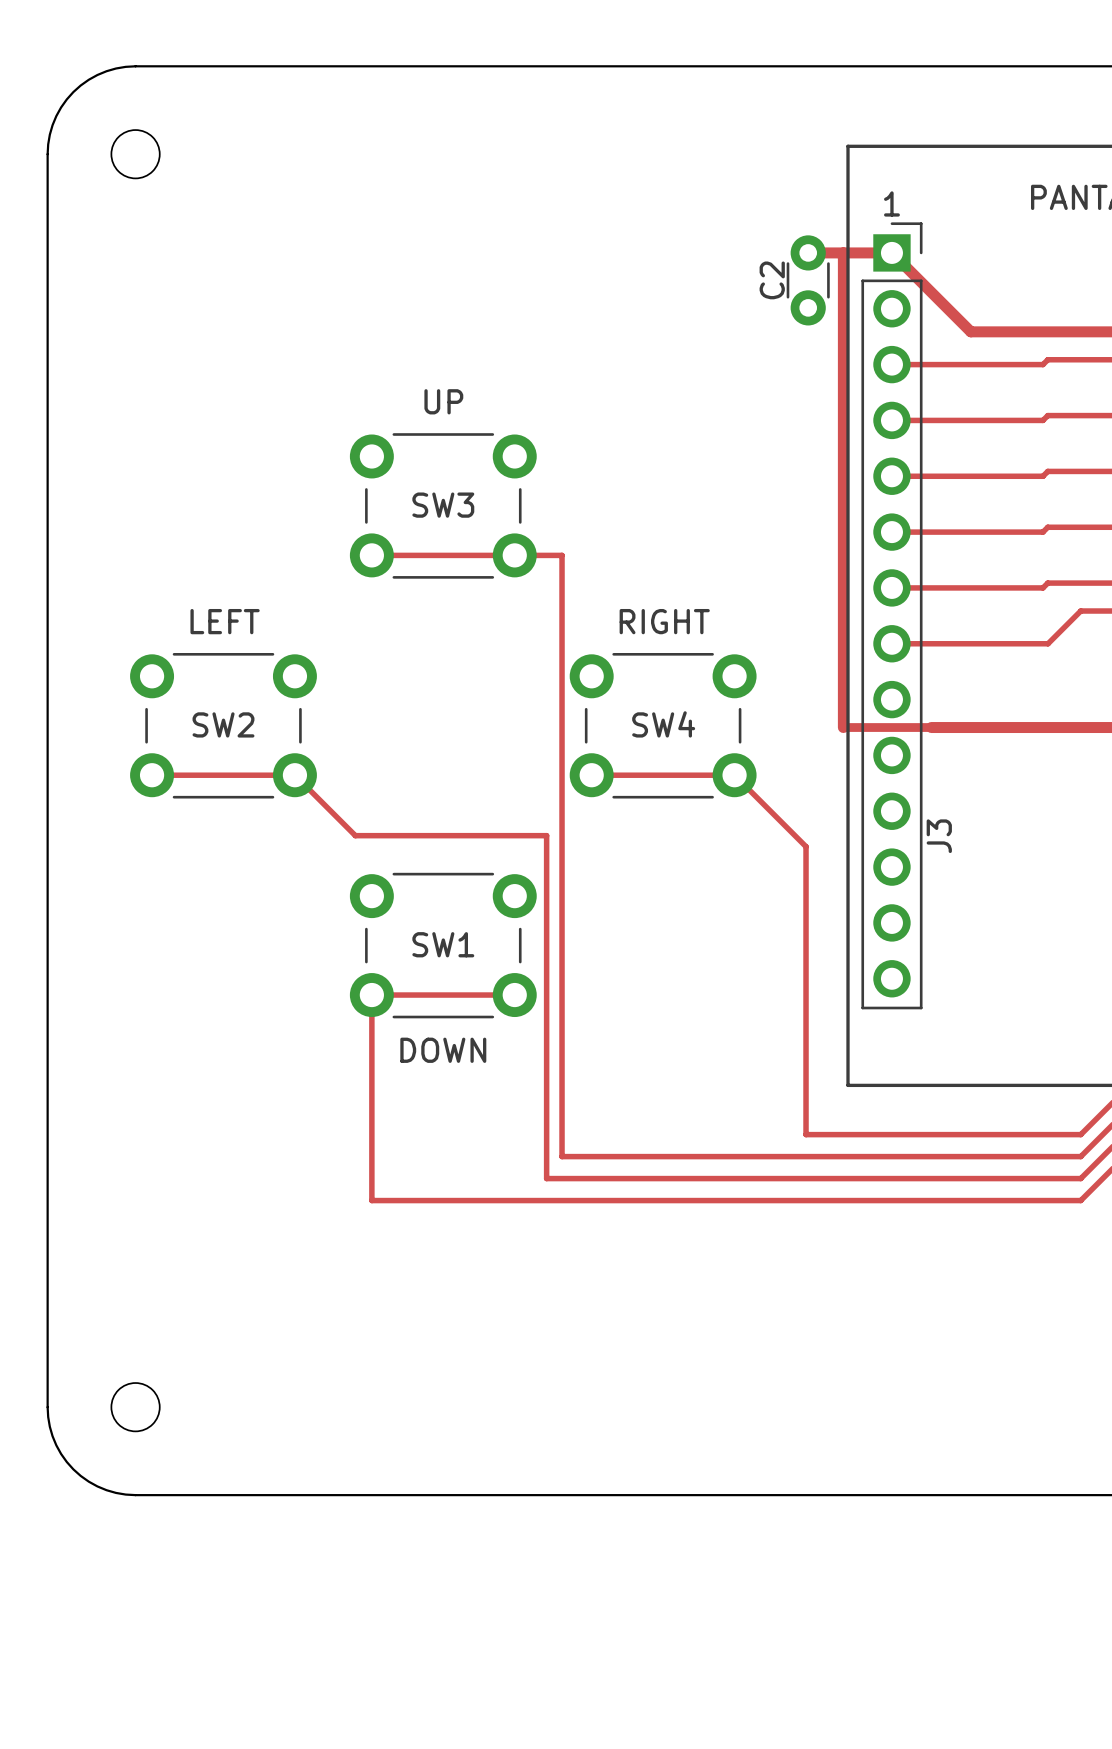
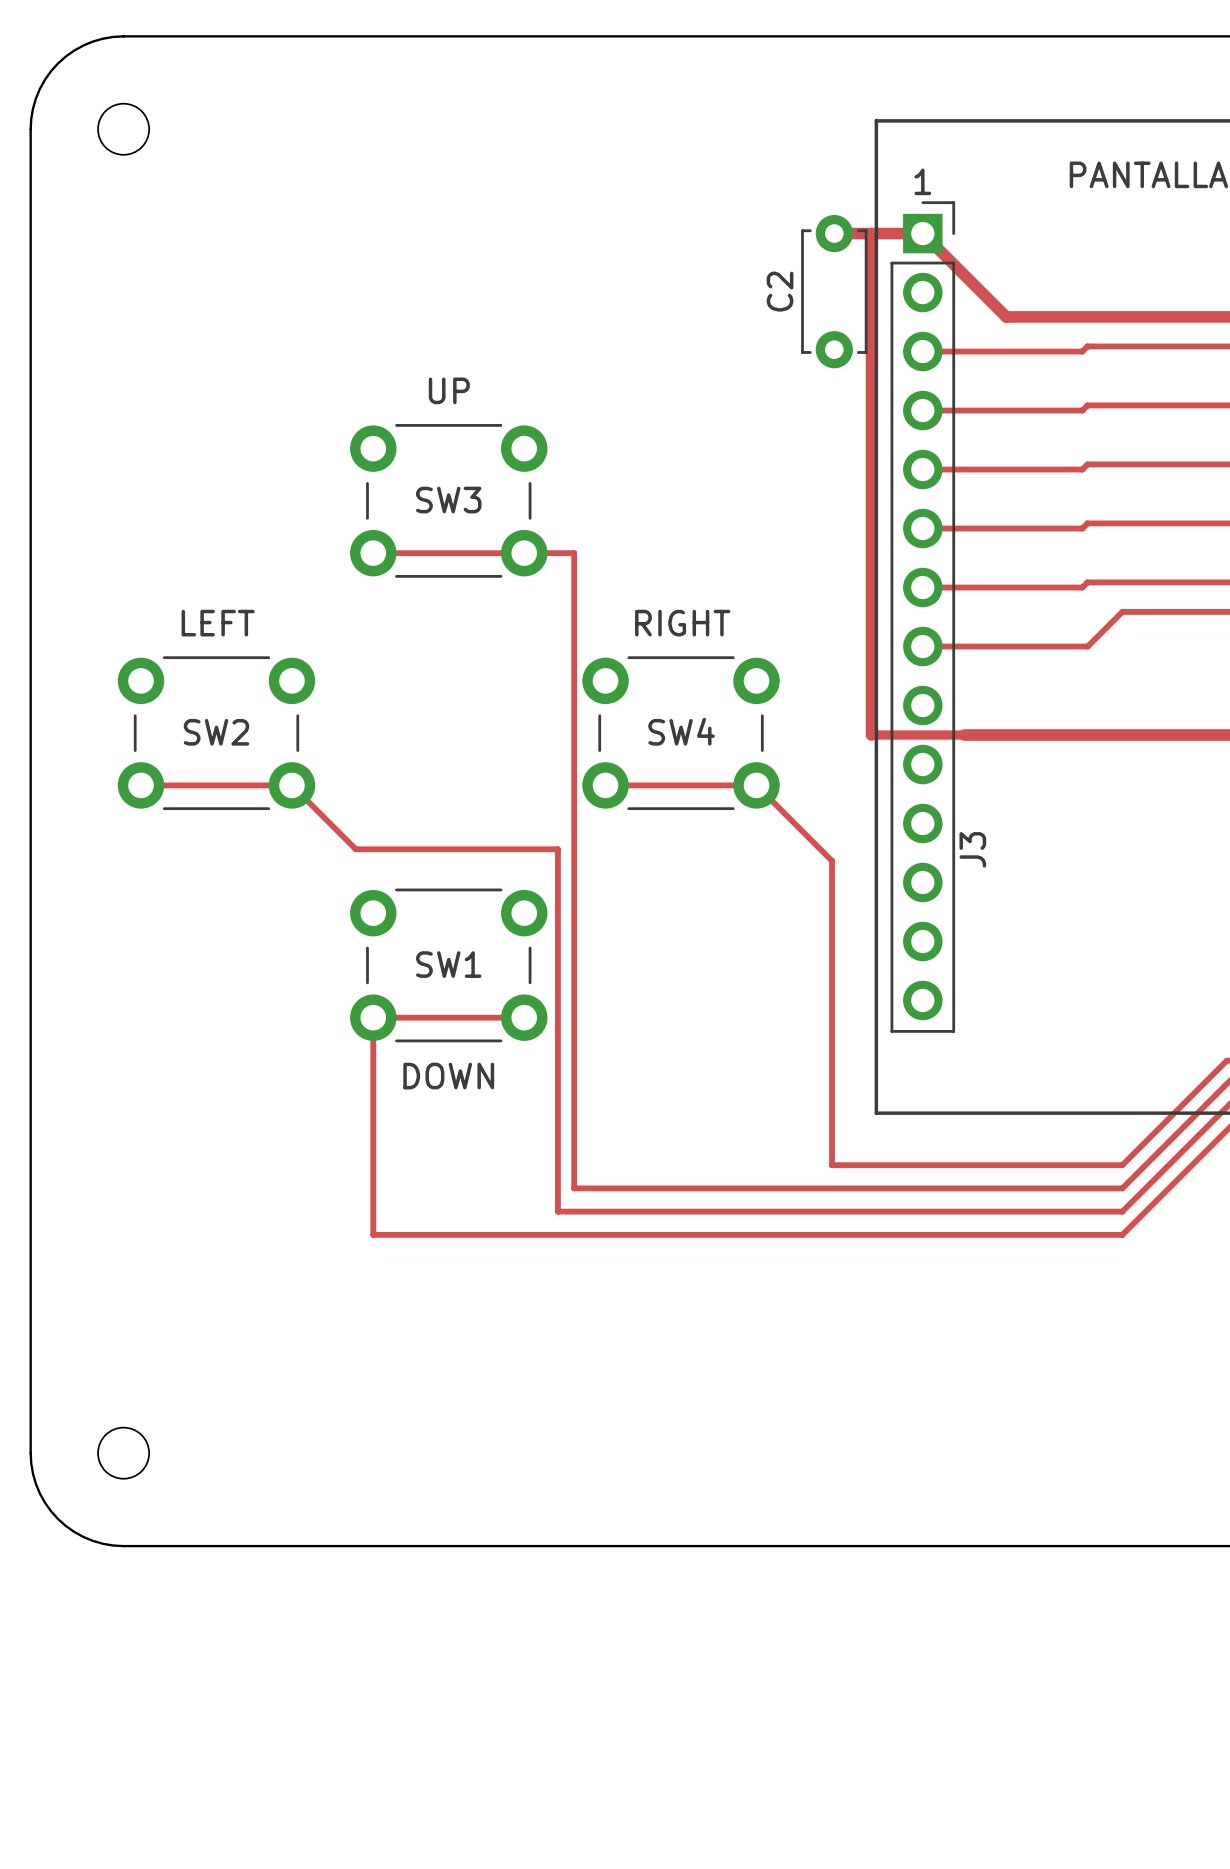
C2 footprint: [786, 235, 830, 326] -> [801, 214, 868, 369]

